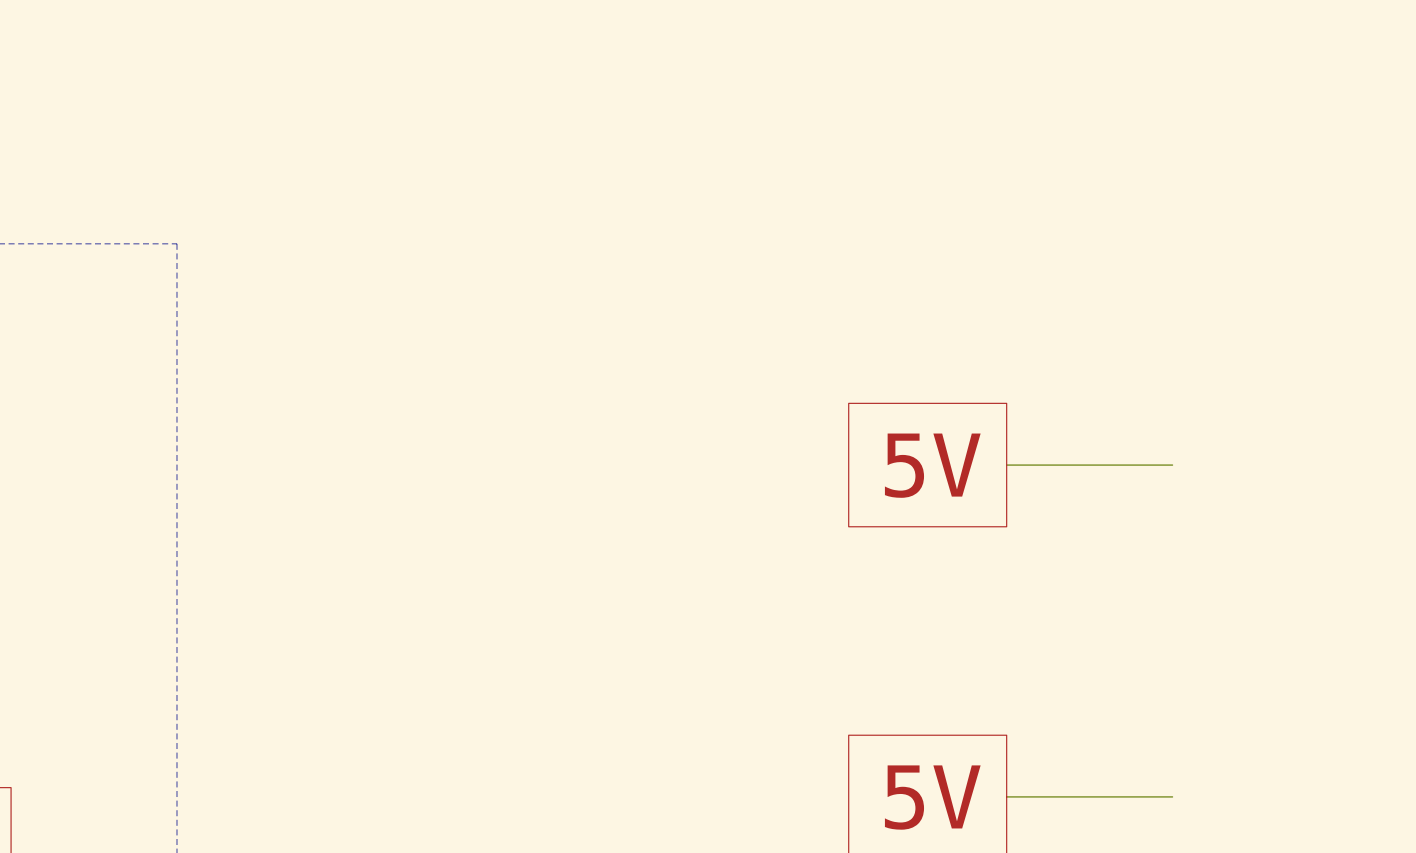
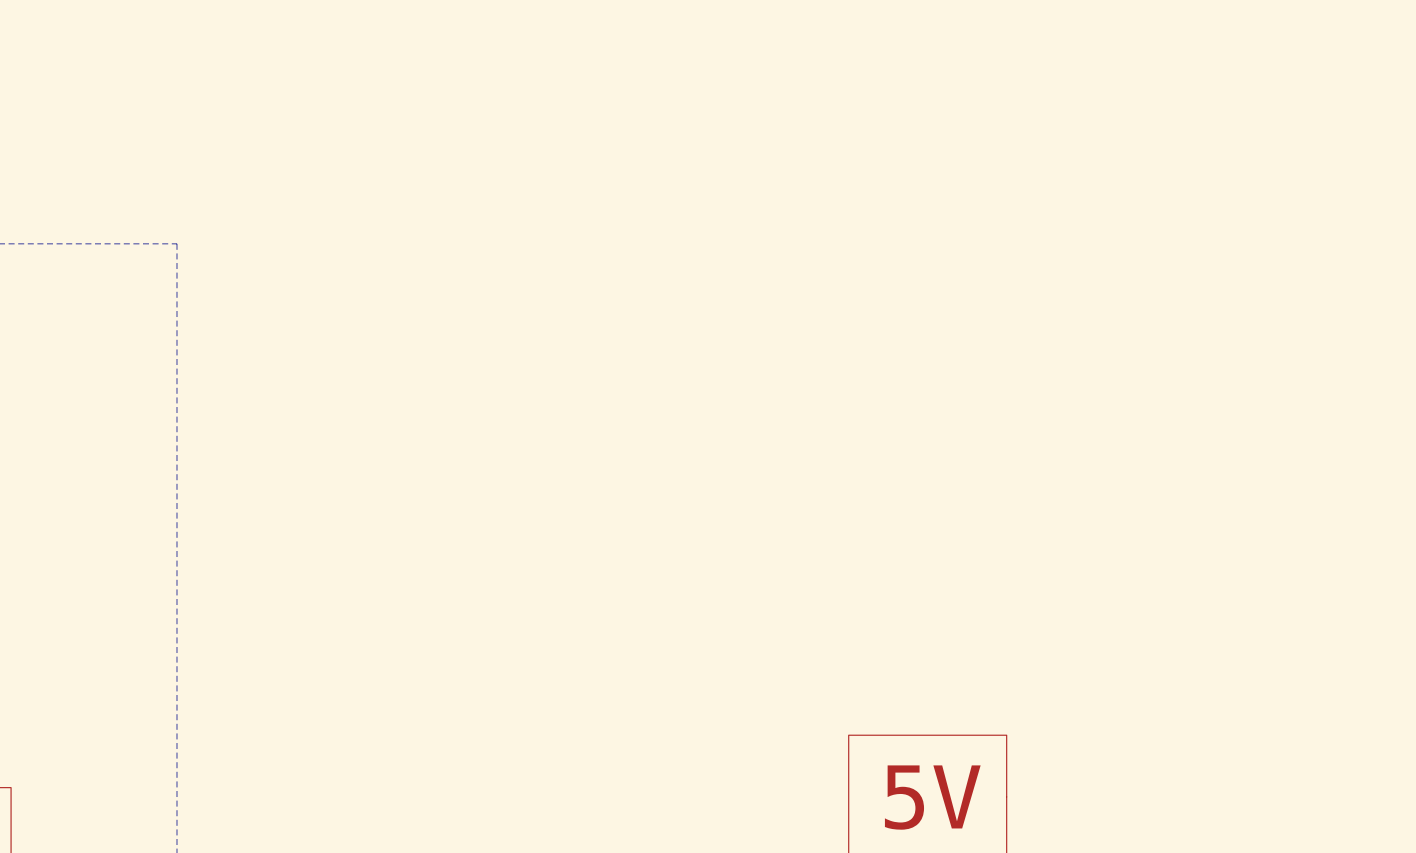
global label: 5V (932, 465) -> none
wire: (1006, 465) (1172, 465) -> none
wire: (1006, 796) (1172, 796) -> none

